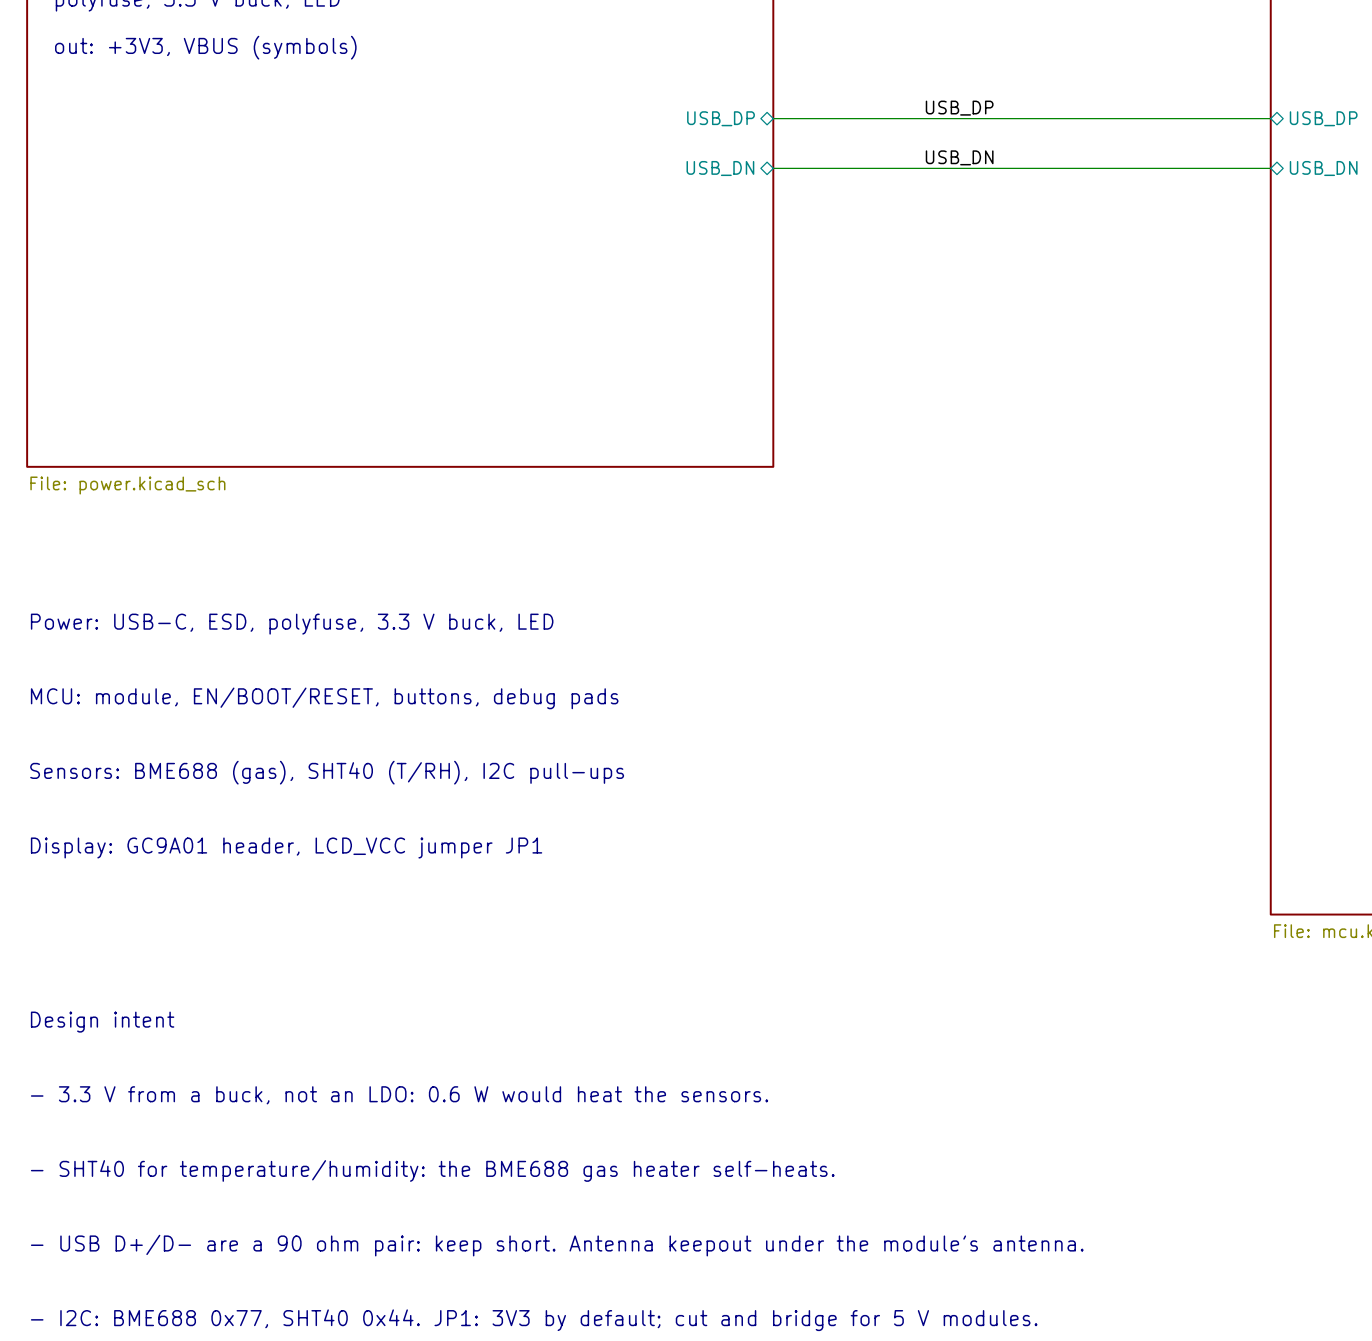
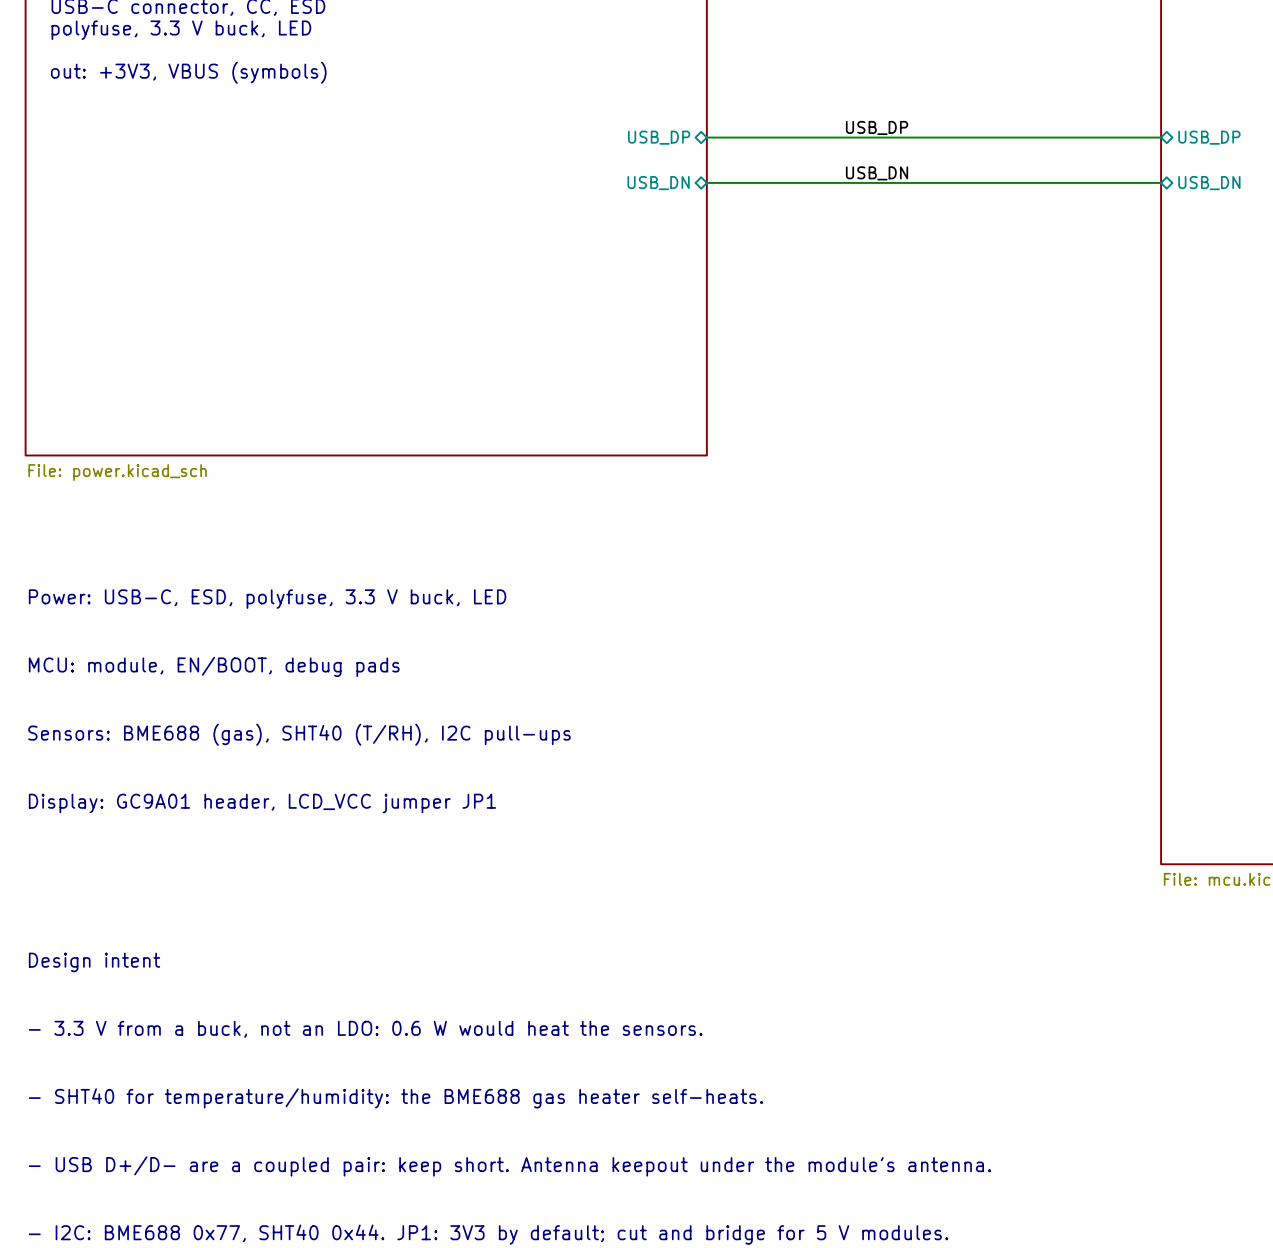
text: MCU: module, EN/BOOT/RESET, buttons, debug pads (324, 698) -> MCU: module, EN/BOOT, debug pads (214, 666)
text: - USB D+/D- are a 90 ohm pair: keep short. Antenna keepout under the module's antenna. (557, 1245) -> - USB D+/D- are a coupled pair: keep short. Antenna keepout under the module's antenna. (509, 1166)

